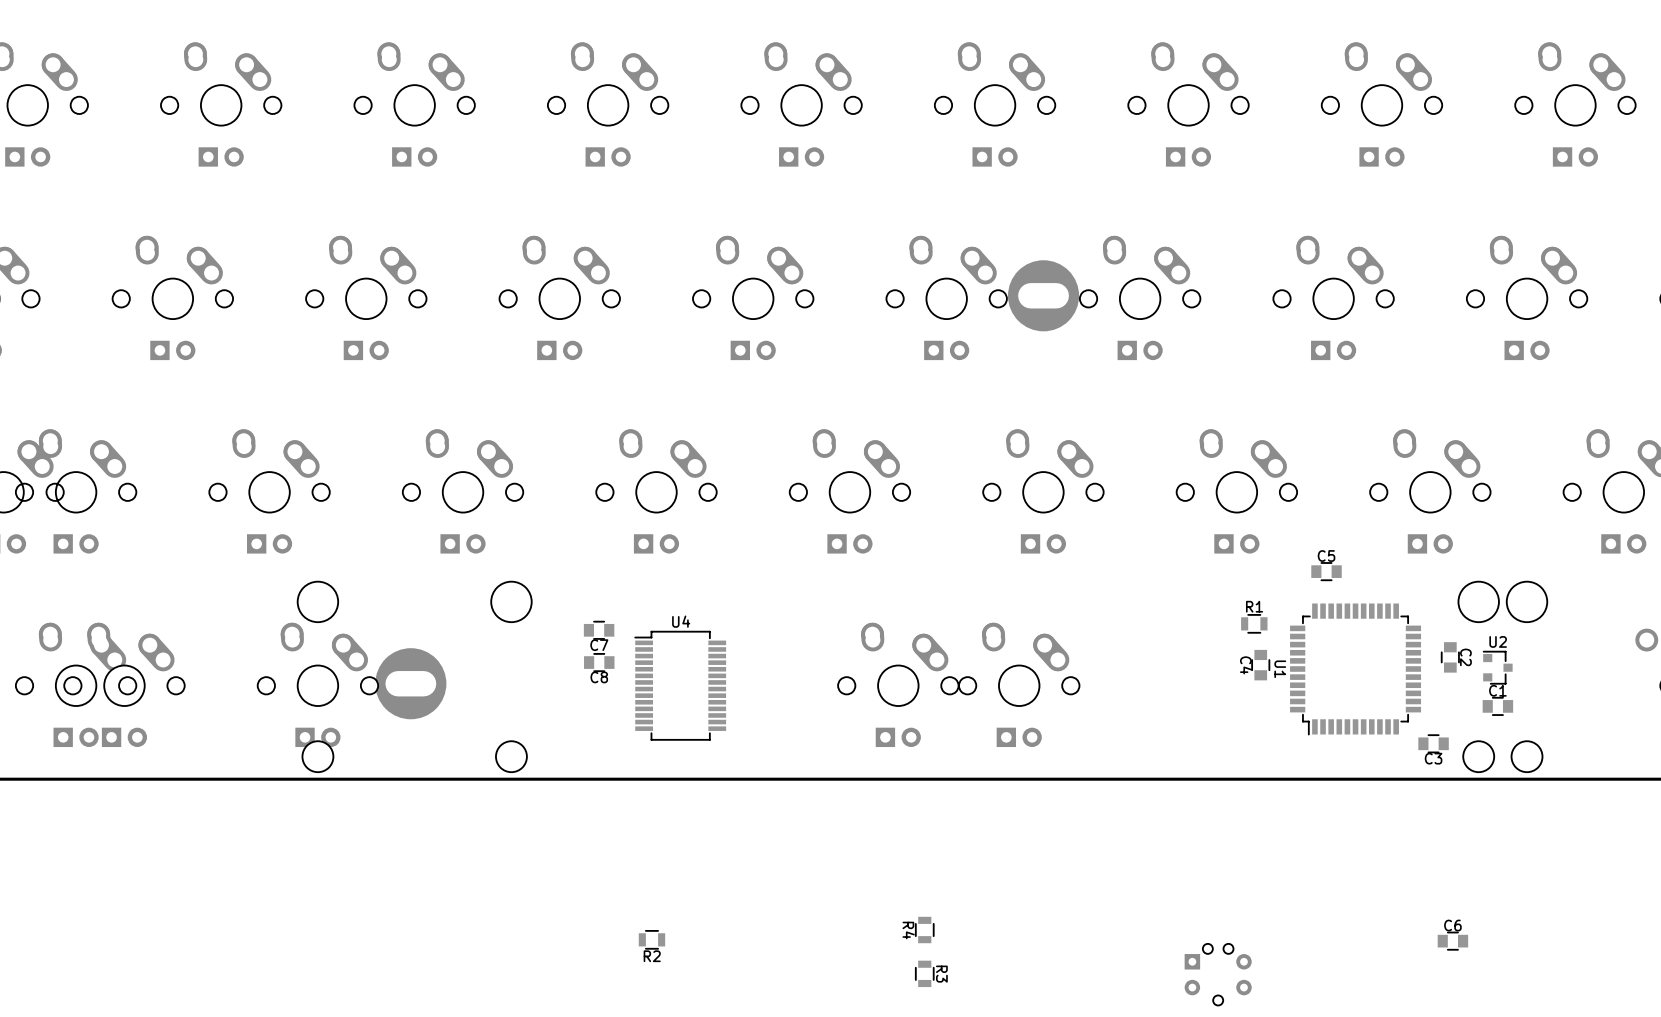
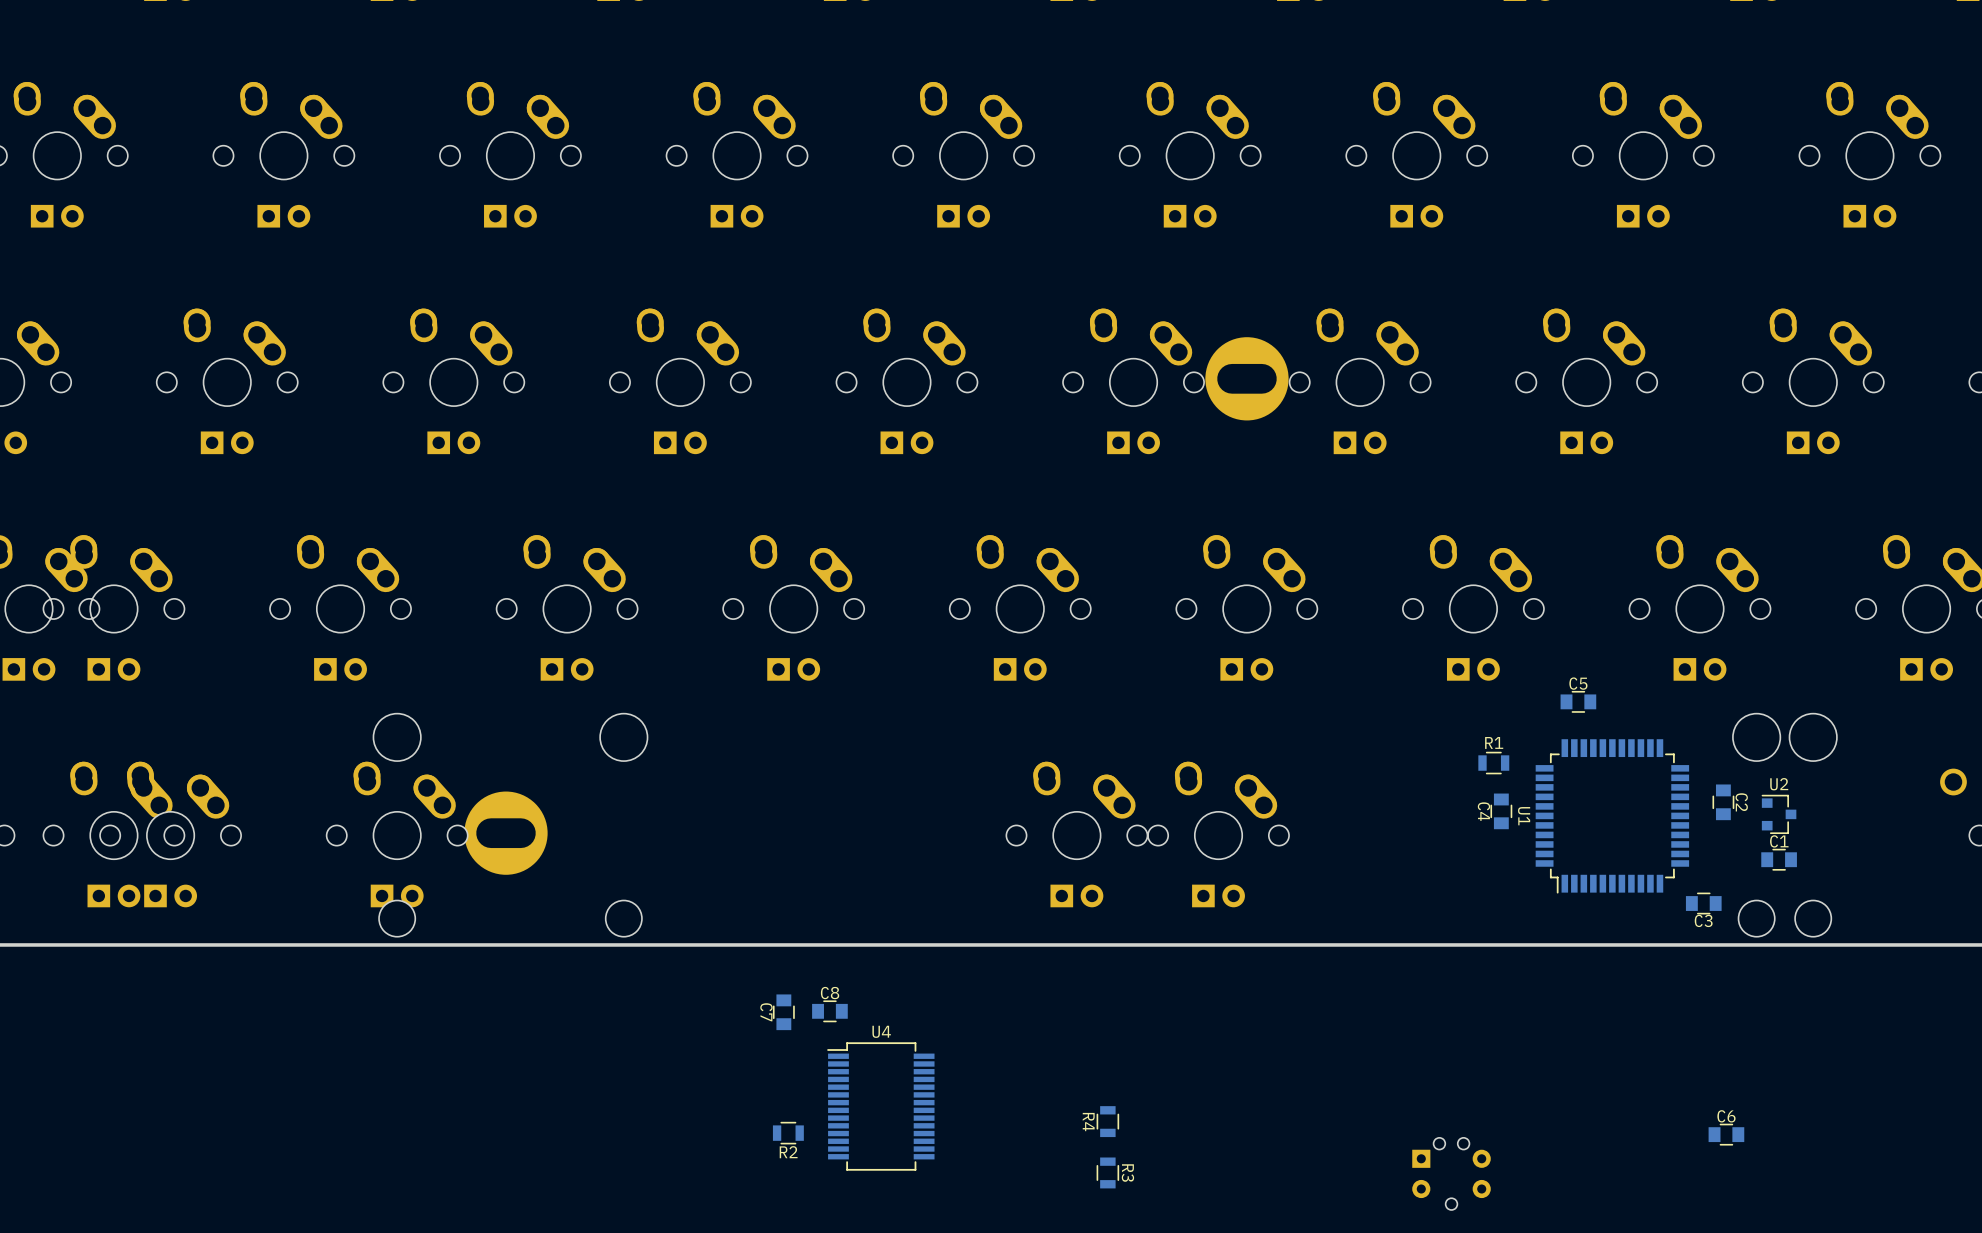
C7 rotation: 0° (599, 630) -> 90° clockwise (783, 1012)
C7 position: (599, 630) -> (783, 1012)
C8 position: (599, 662) -> (829, 1011)
C8 name position: C8 (599, 677) -> C8 (830, 993)
U4 position: (680, 685) -> (880, 1106)

